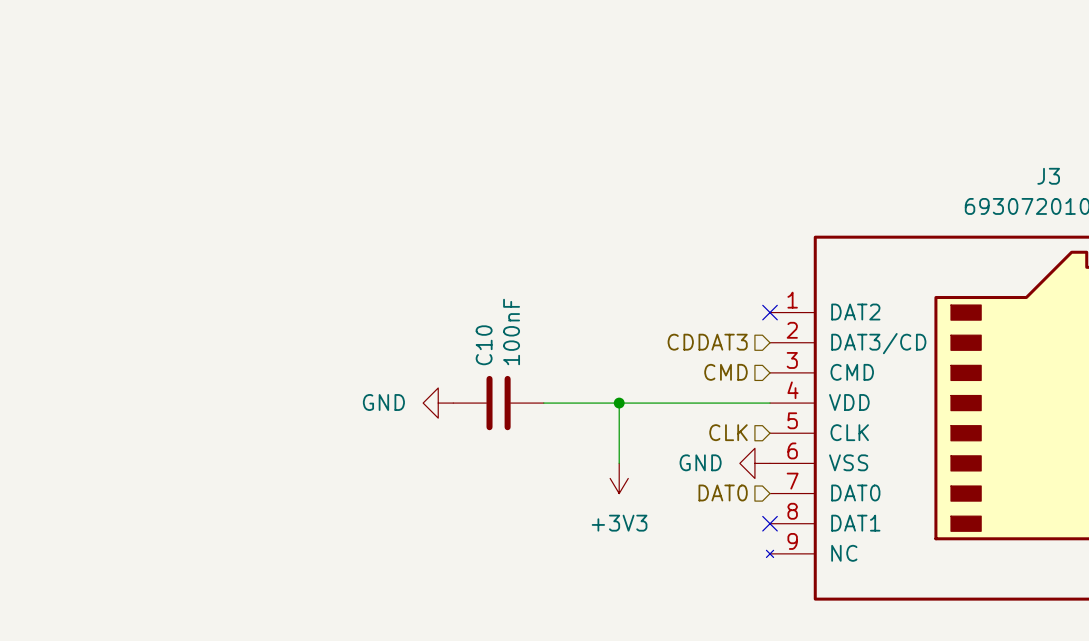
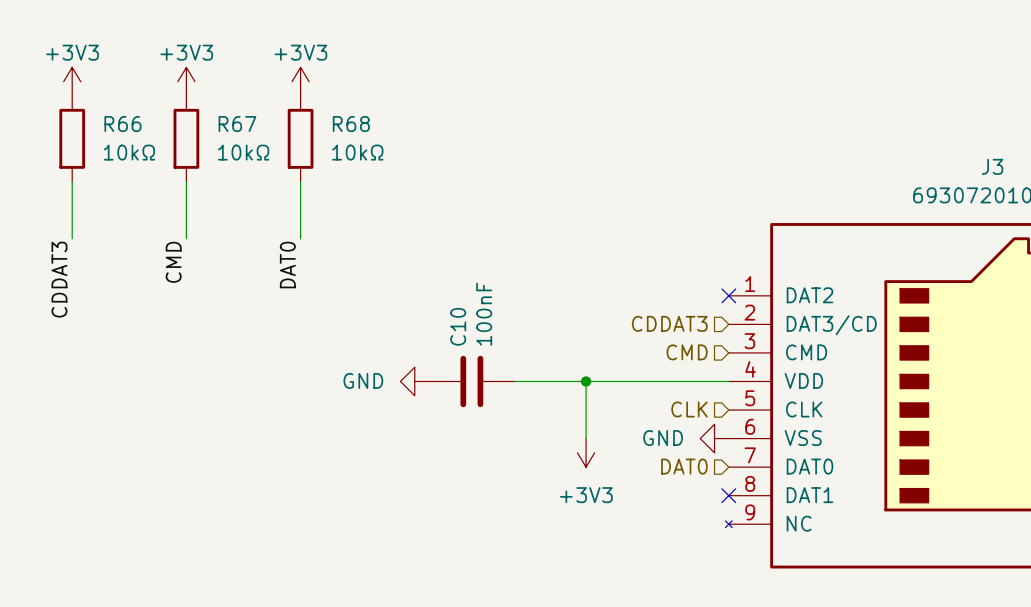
power symbol: none -> +3V3 (72, 81)
power symbol: none -> +3V3 (186, 81)
power symbol: none -> +3V3 (300, 81)
R66: none -> 10kΩ (72, 138)
R67: none -> 10kΩ (186, 138)
R68: none -> 10kΩ (300, 138)
wire: none -> (72, 181) (72, 238)
wire: none -> (186, 181) (186, 238)
wire: none -> (300, 181) (300, 238)
label: none -> CMD (173, 262)
label: none -> DAT0 (287, 265)
label: none -> CDDAT3 (59, 279)

